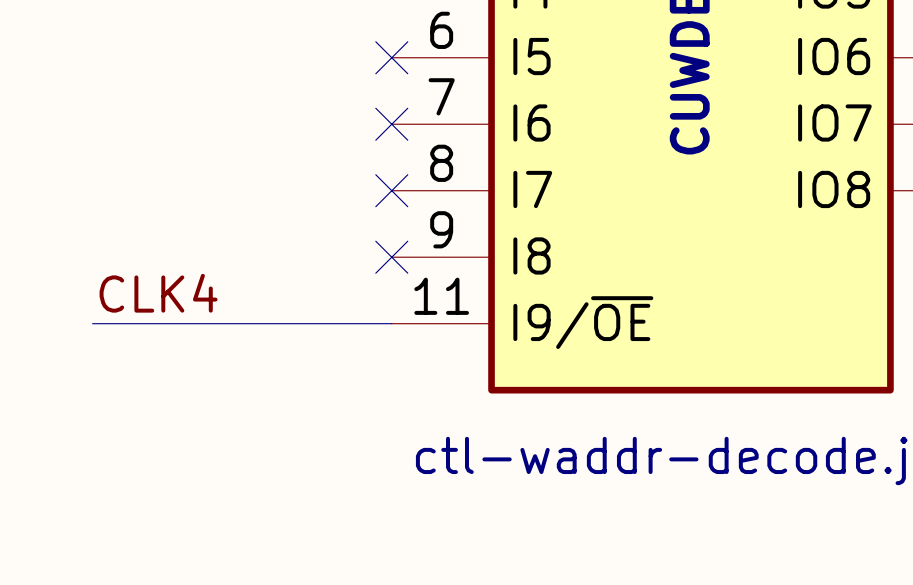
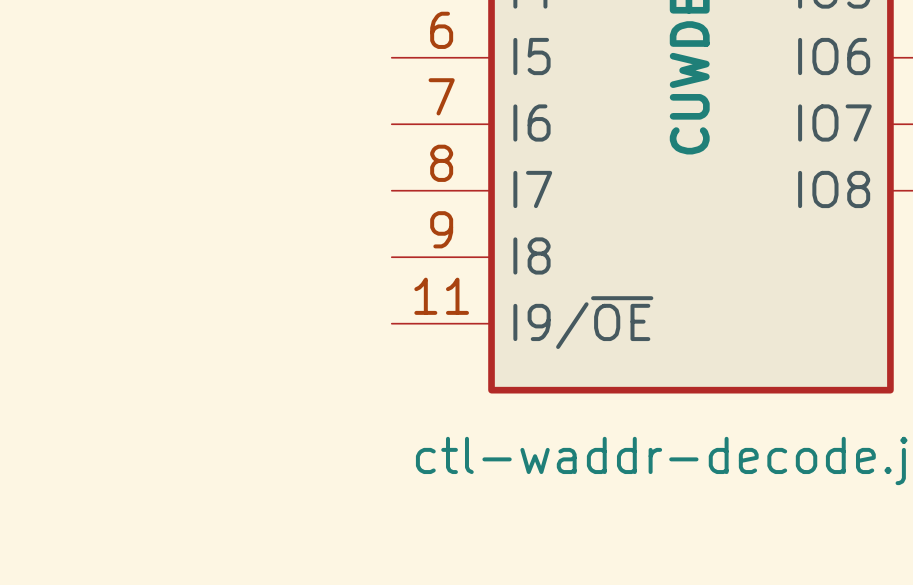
no-connect mark: (391, 57) -> none
no-connect mark: (391, 124) -> none
no-connect mark: (391, 190) -> none
no-connect mark: (391, 257) -> none
label: CLK4 (158, 293) -> none
wire: (92, 323) (391, 323) -> none

